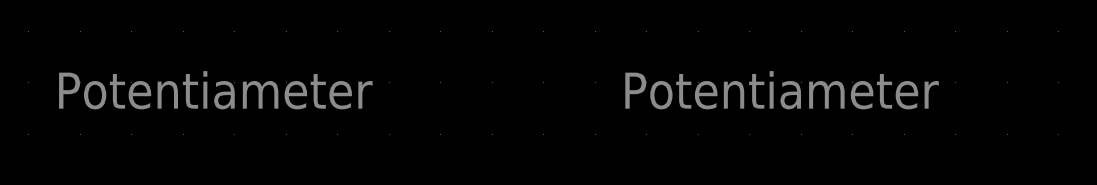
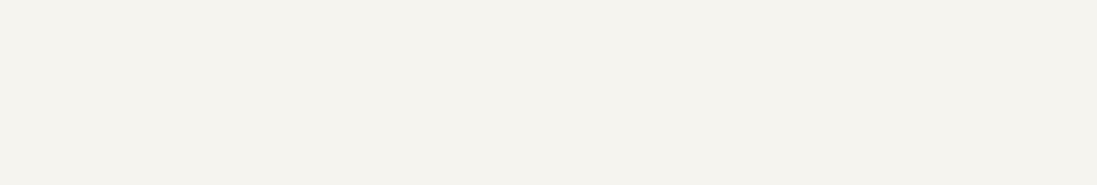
text: Potentiameter (215, 90) -> none
text: Potentiameter (782, 90) -> none

